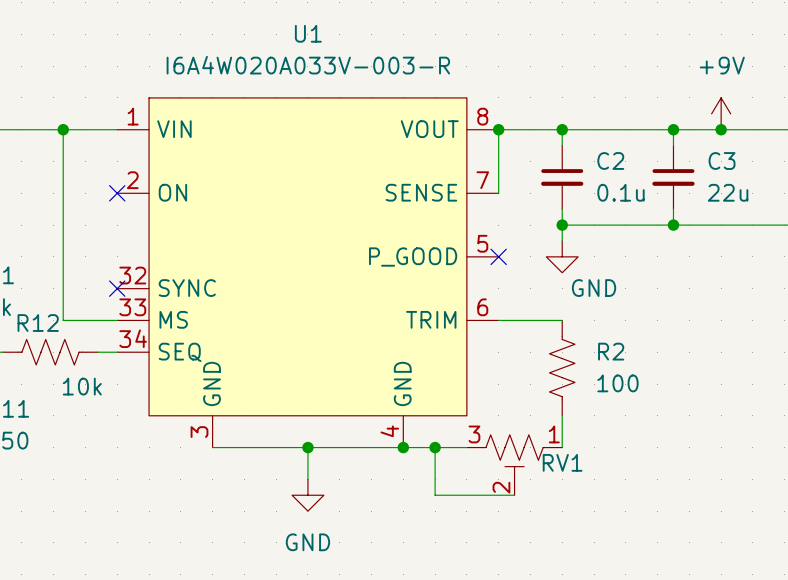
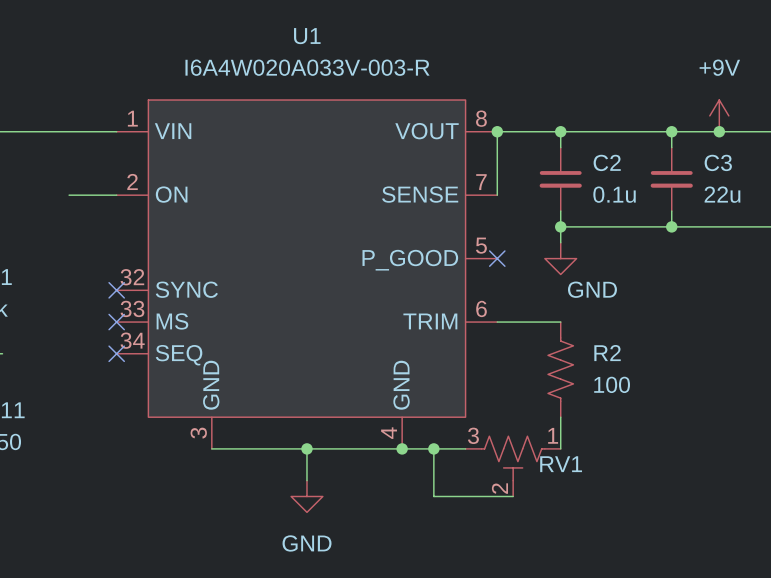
wire: (63, 129) (63, 320) (117, 320) -> none
junction: (63, 129) -> none
wire: none -> (69, 195) (116, 195)
no-connect mark: (117, 193) -> none
no-connect mark: none -> (116, 322)
R12: 10k (50, 352) -> none
wire: (98, 352) (117, 352) -> none
no-connect mark: none -> (116, 353)

